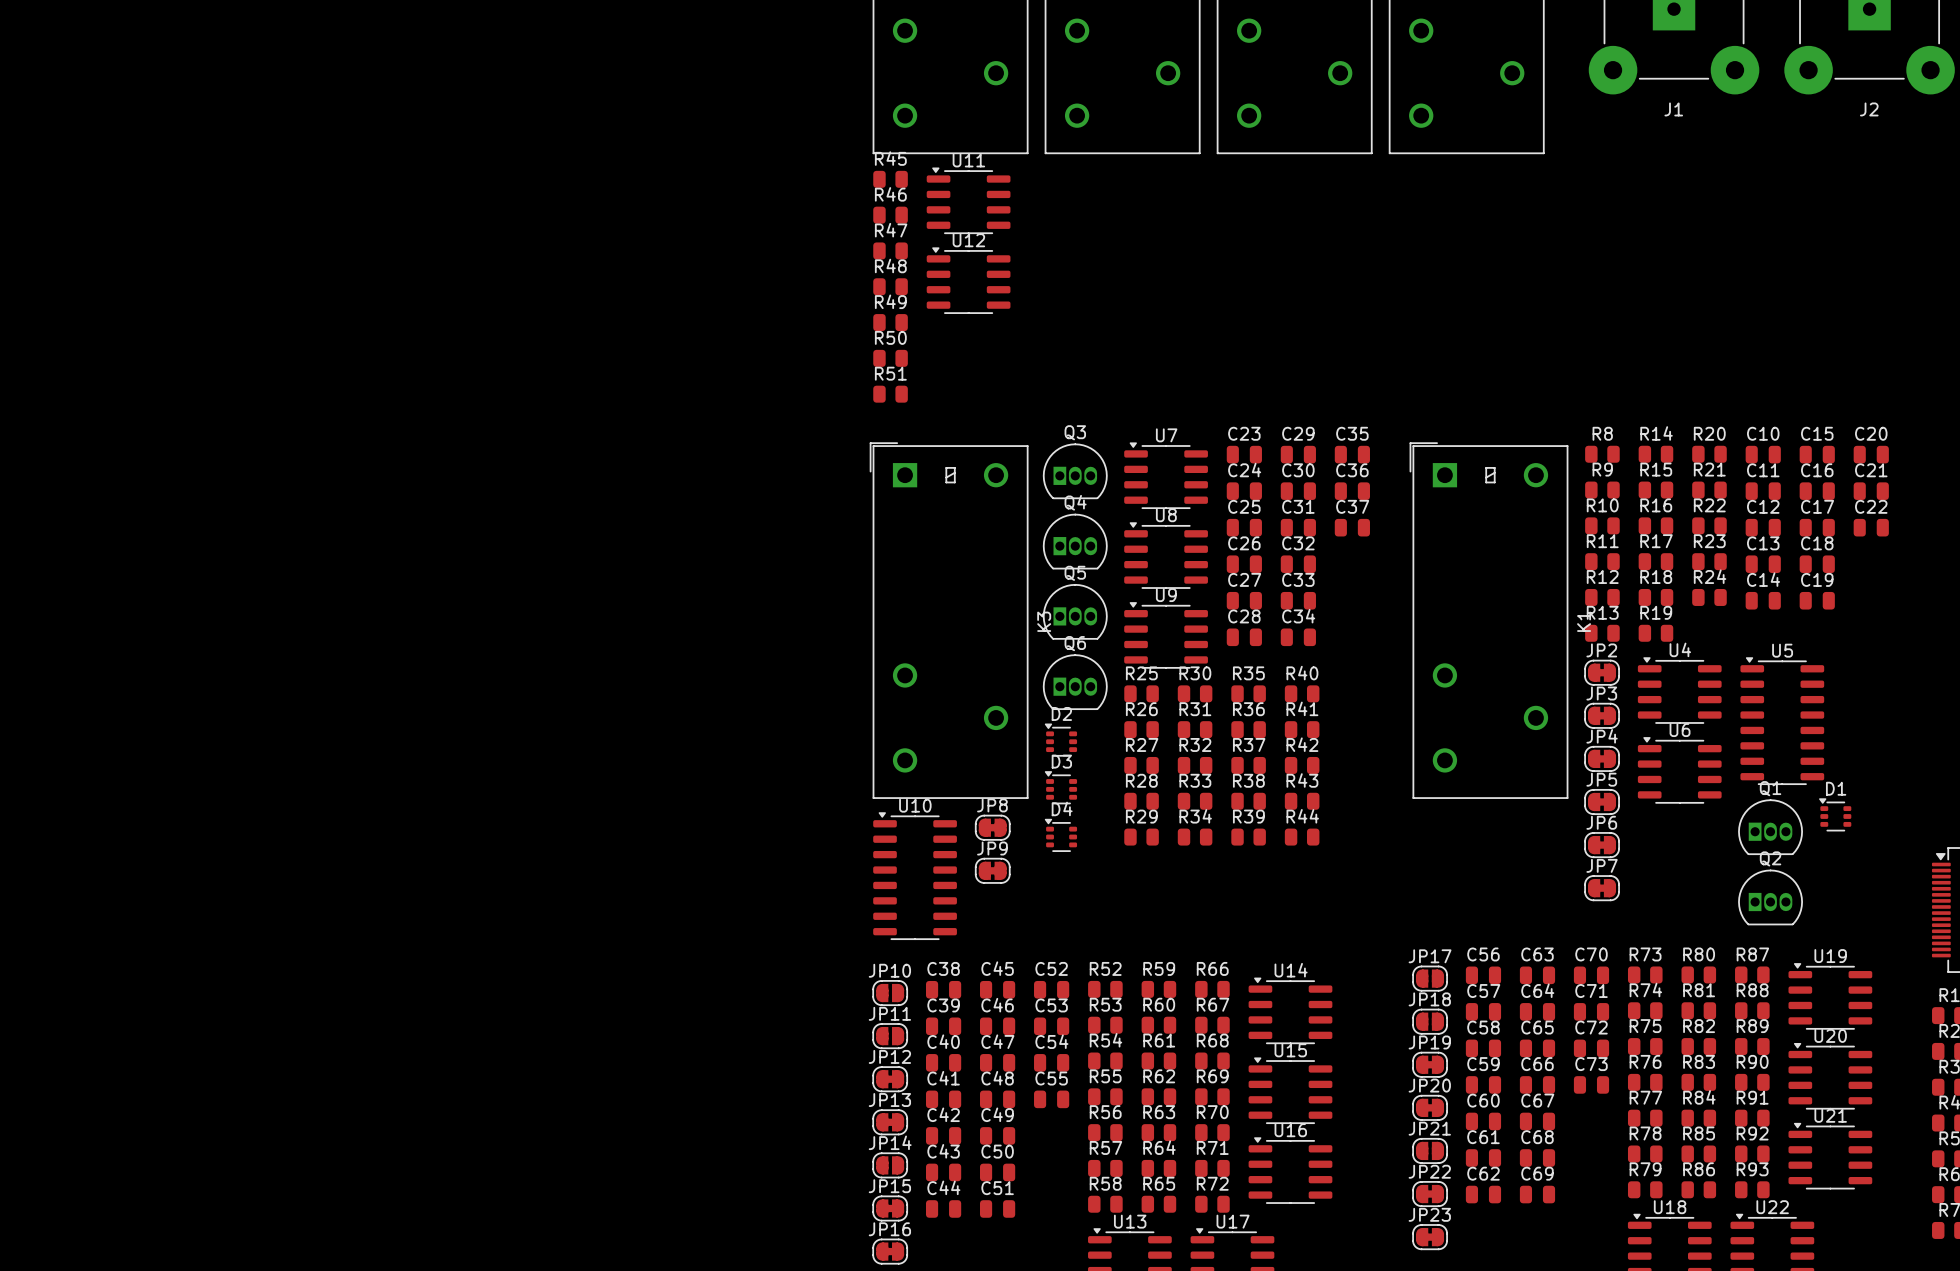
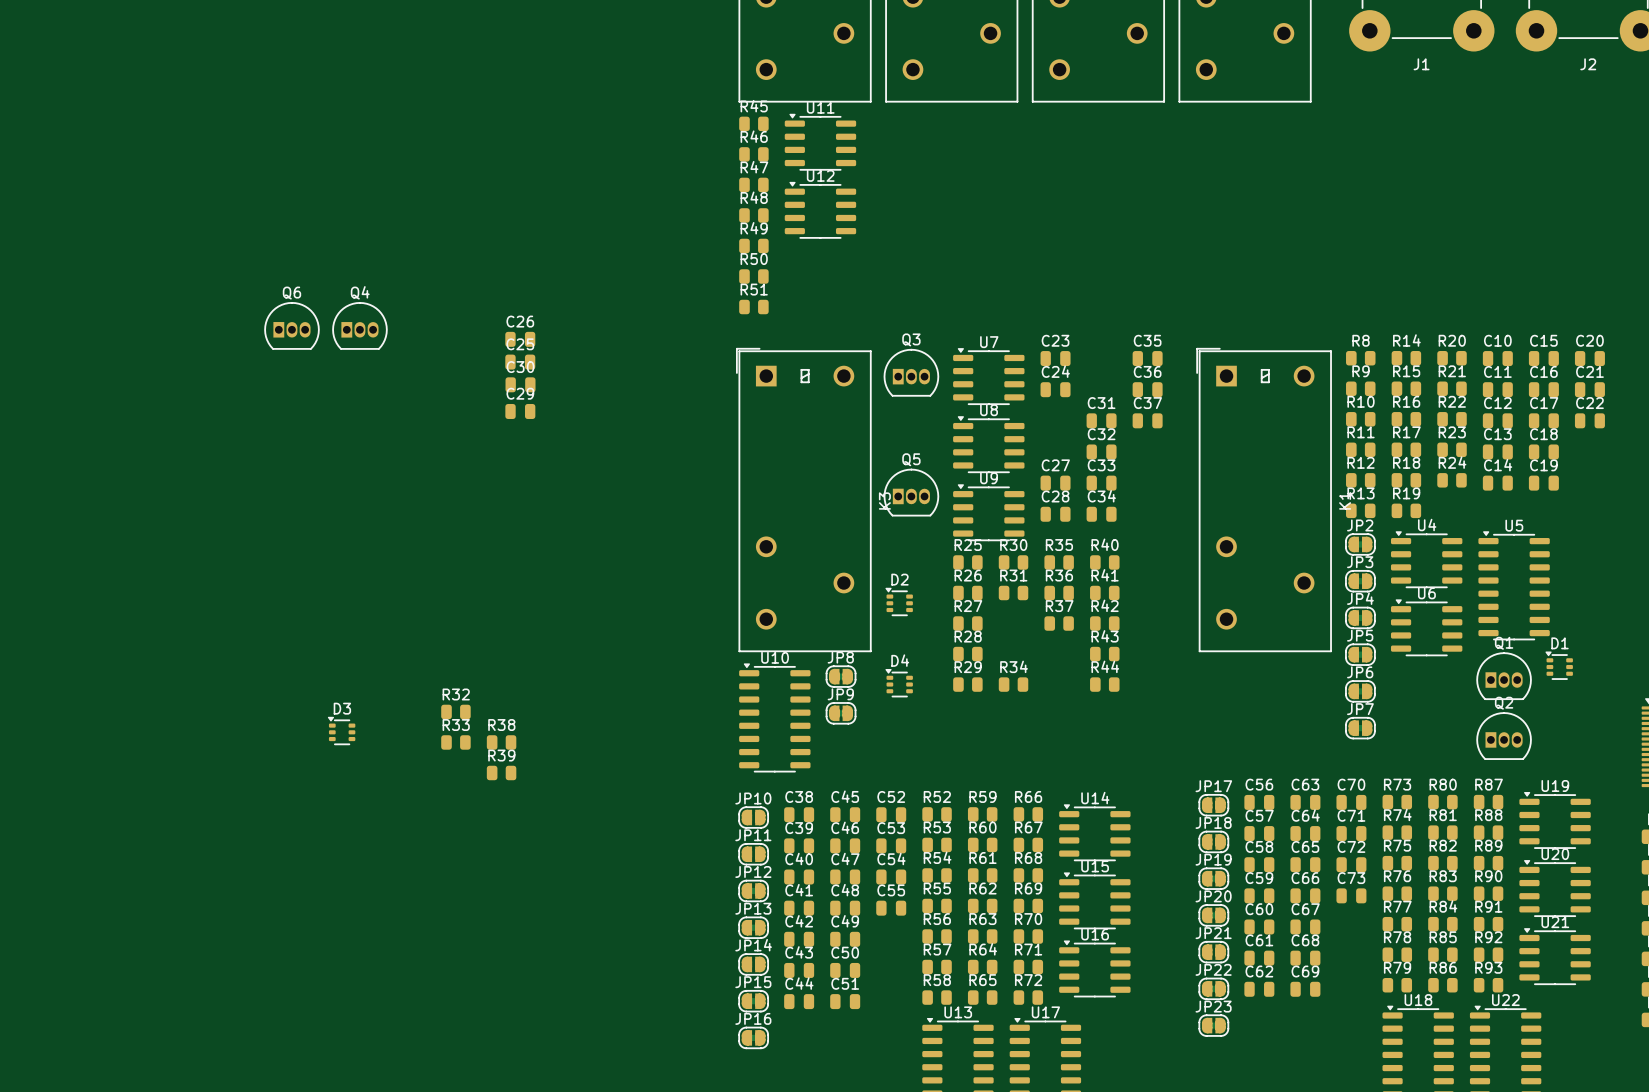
C29 position: (1298, 454) -> (520, 411)
C30 position: (1298, 491) -> (520, 384)
C25 position: (1244, 527) -> (520, 362)
Q4 position: (1075, 541) -> (359, 325)
C26 position: (1244, 564) -> (520, 339)
Q6 position: (1075, 682) -> (291, 325)
R32 position: (1195, 765) -> (455, 711)
D3 position: (1060, 787) -> (341, 730)
R33 position: (1195, 801) -> (455, 742)
R38 position: (1248, 801) -> (501, 742)
R39 position: (1248, 837) -> (501, 772)

